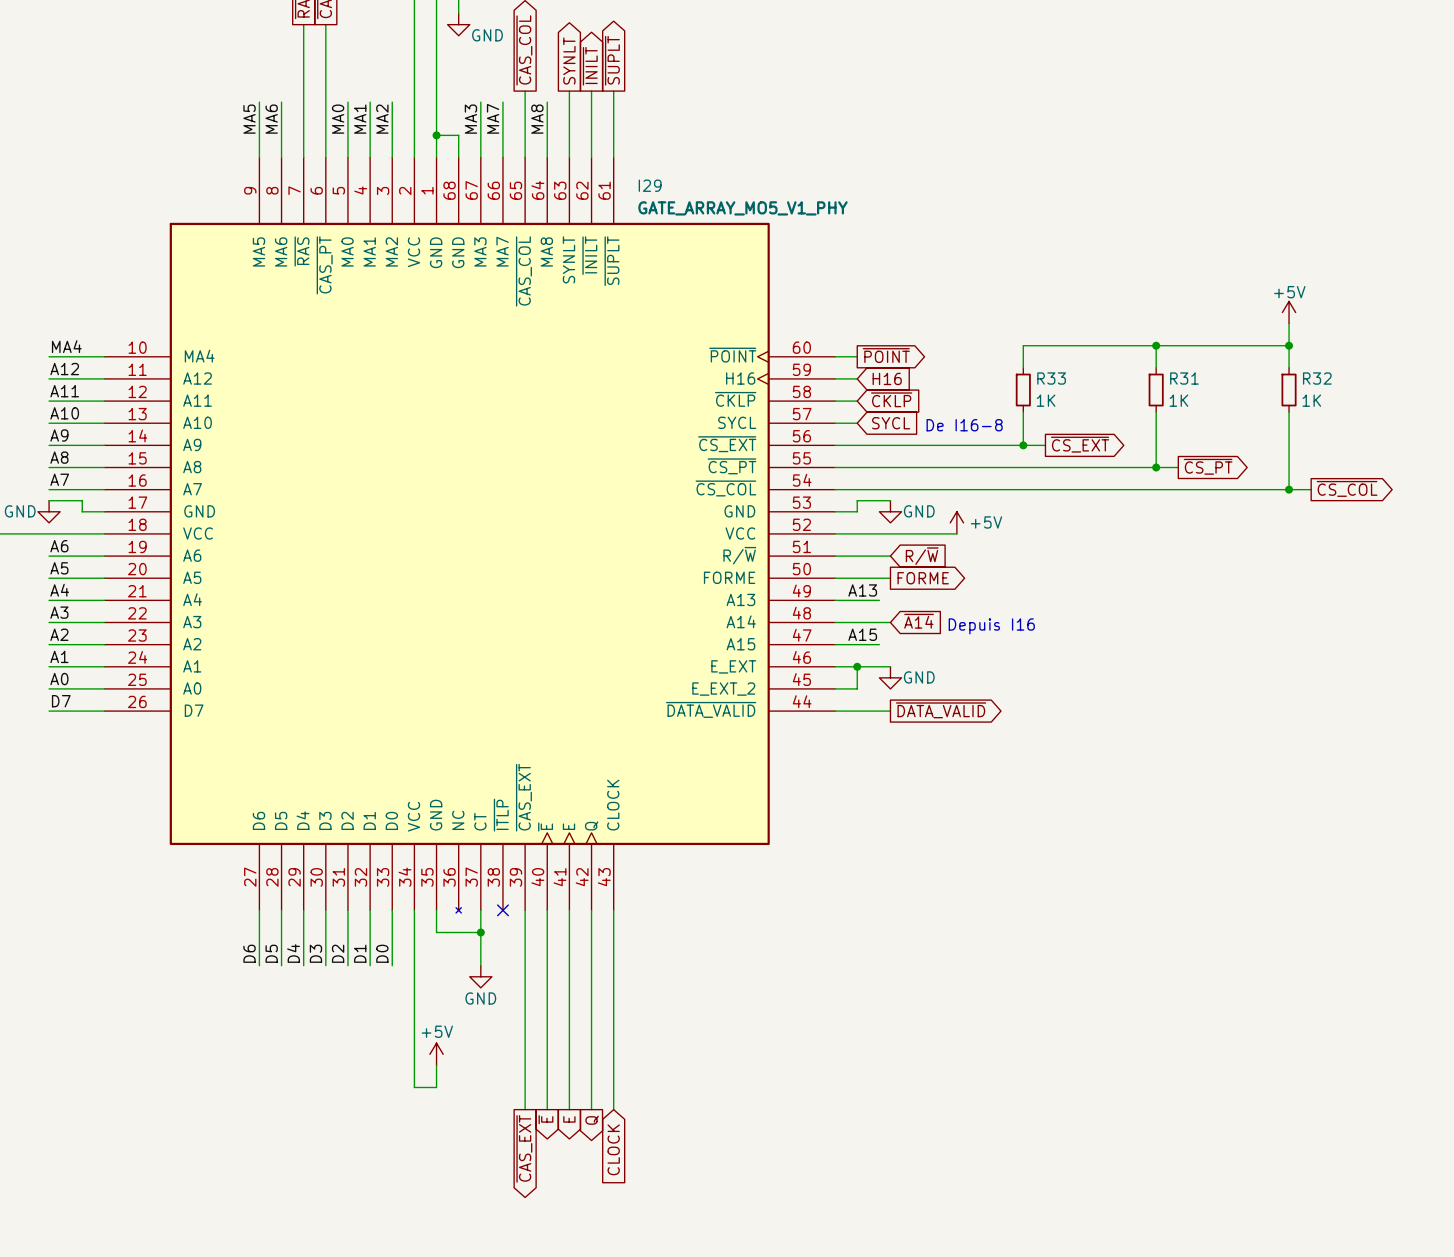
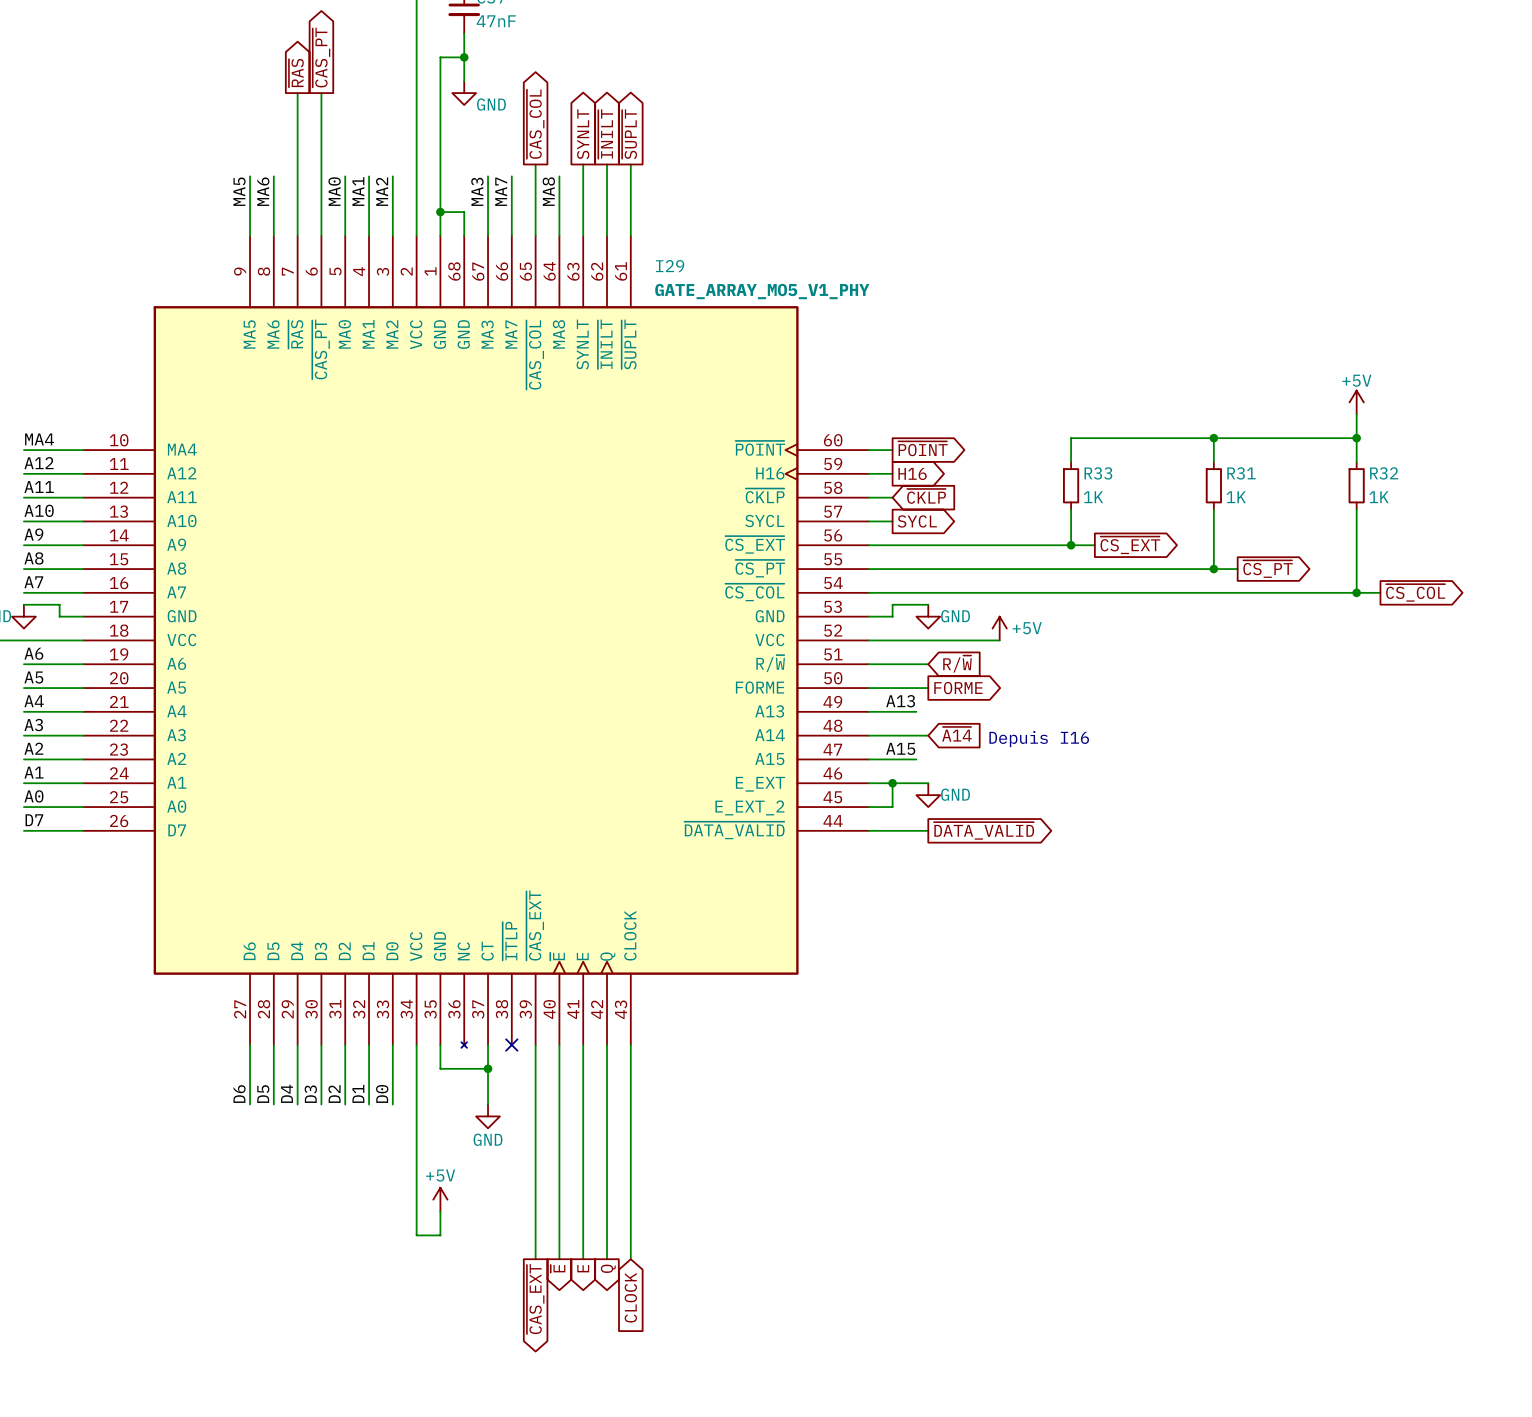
global label shape: input (887, 378) -> output (912, 473)
global label shape: input (891, 423) -> output (917, 521)
text: De I16-8 (964, 425) -> none

